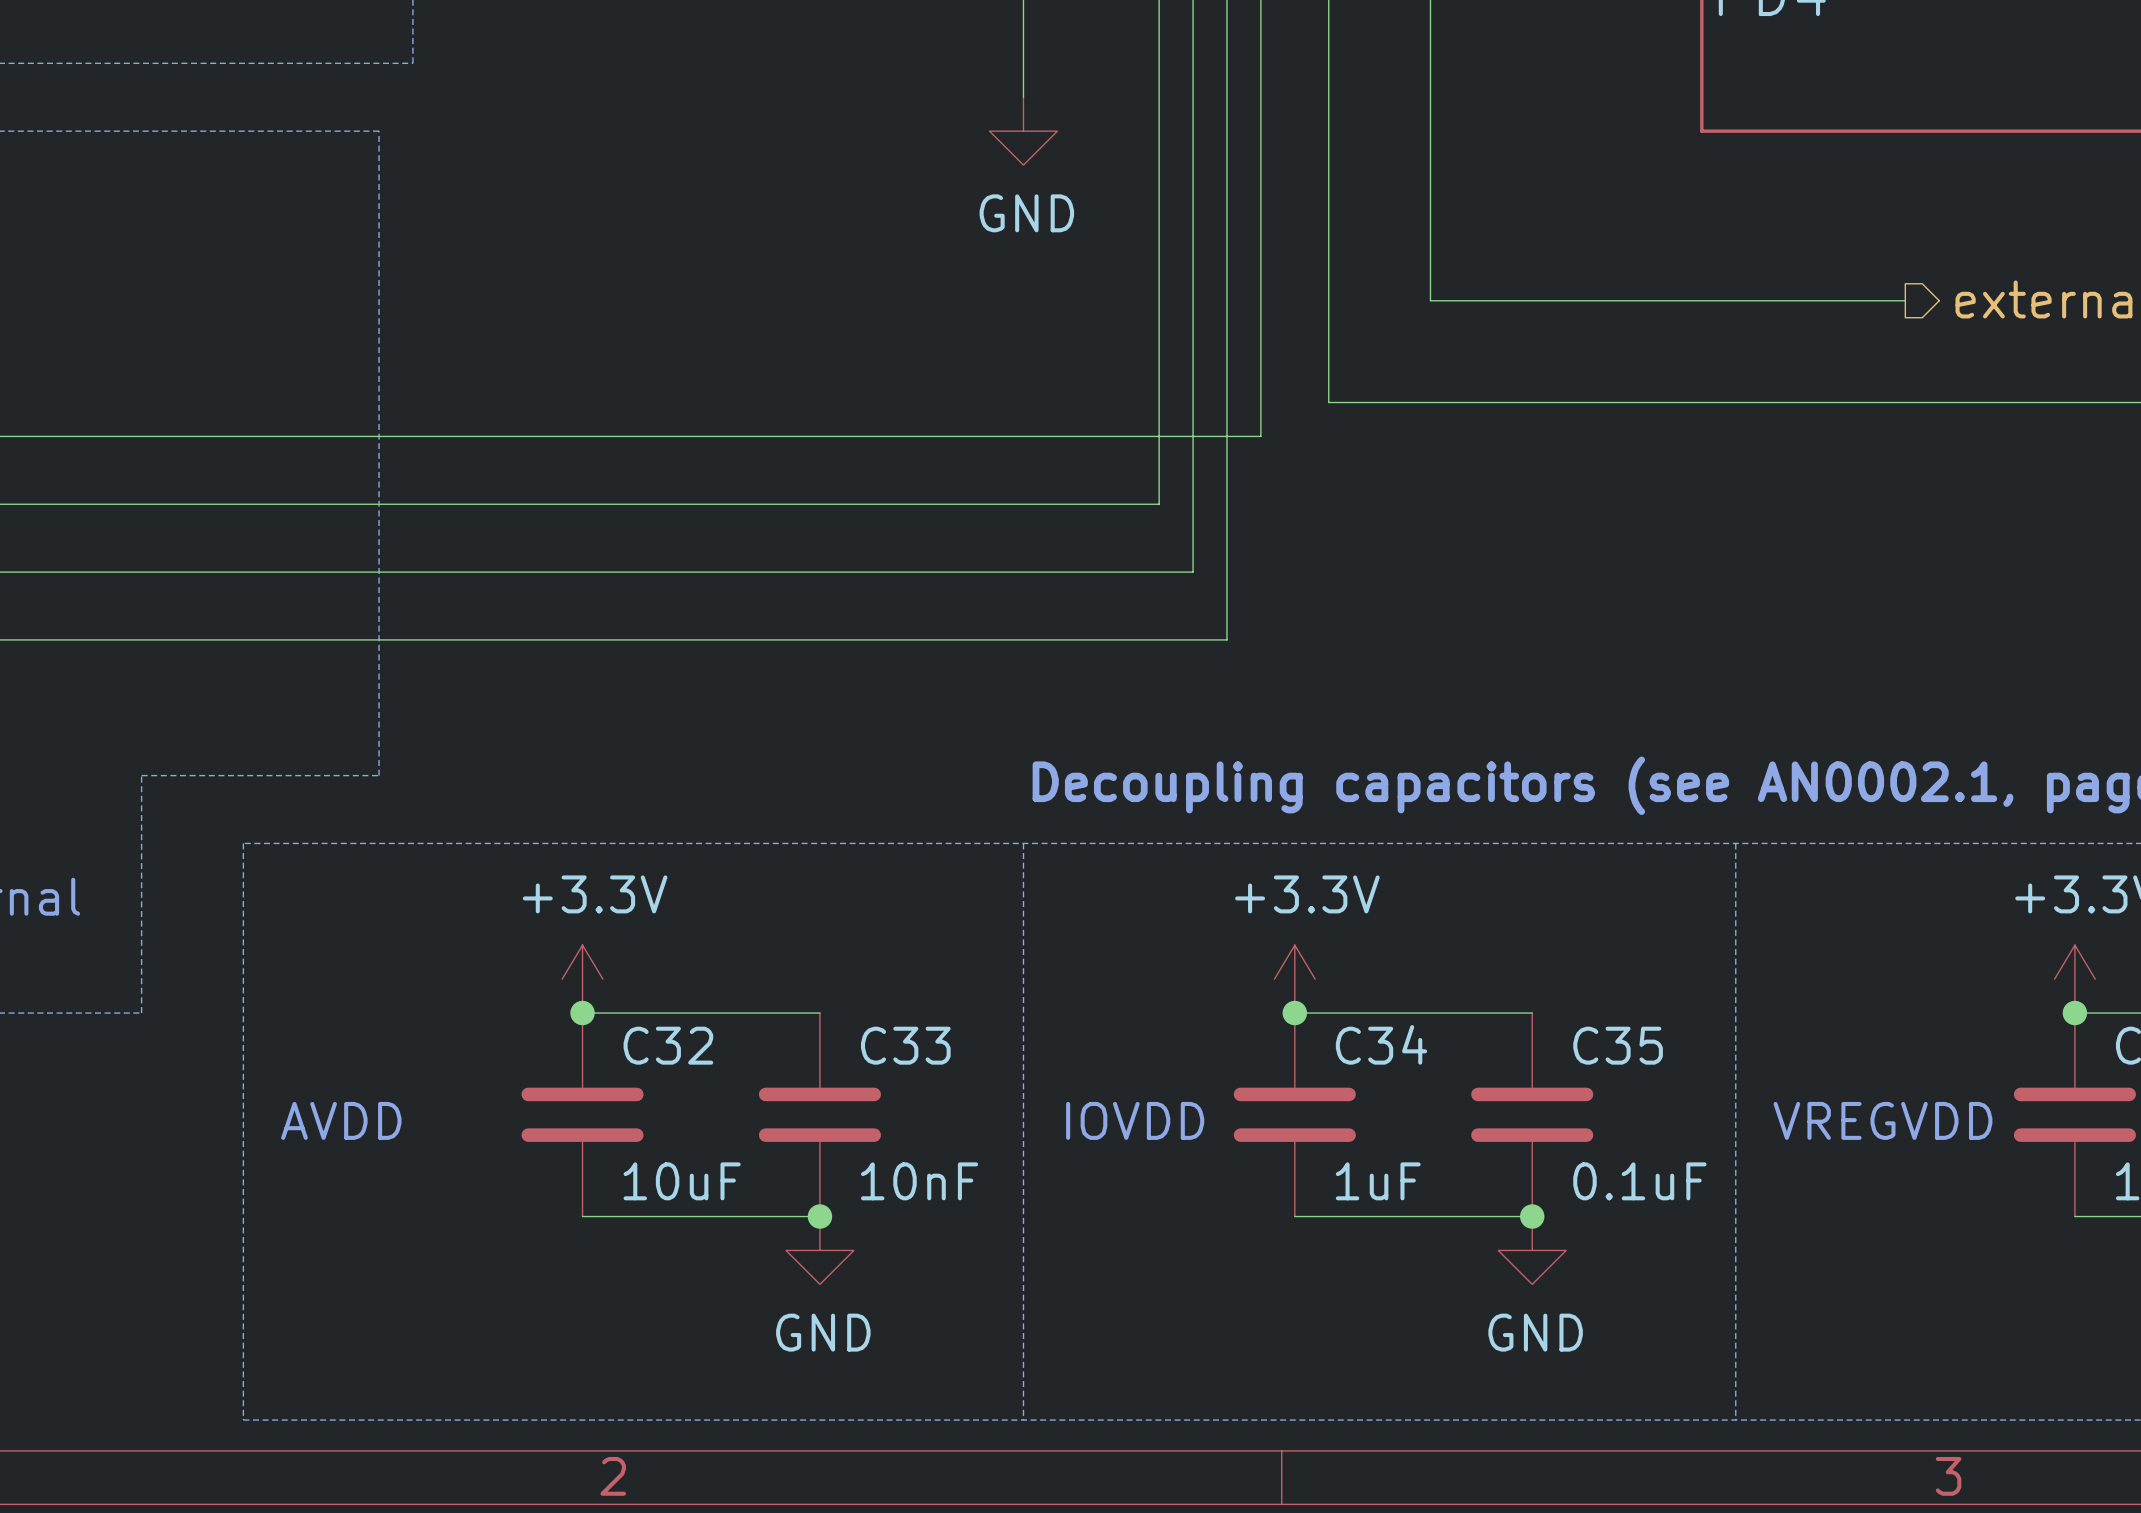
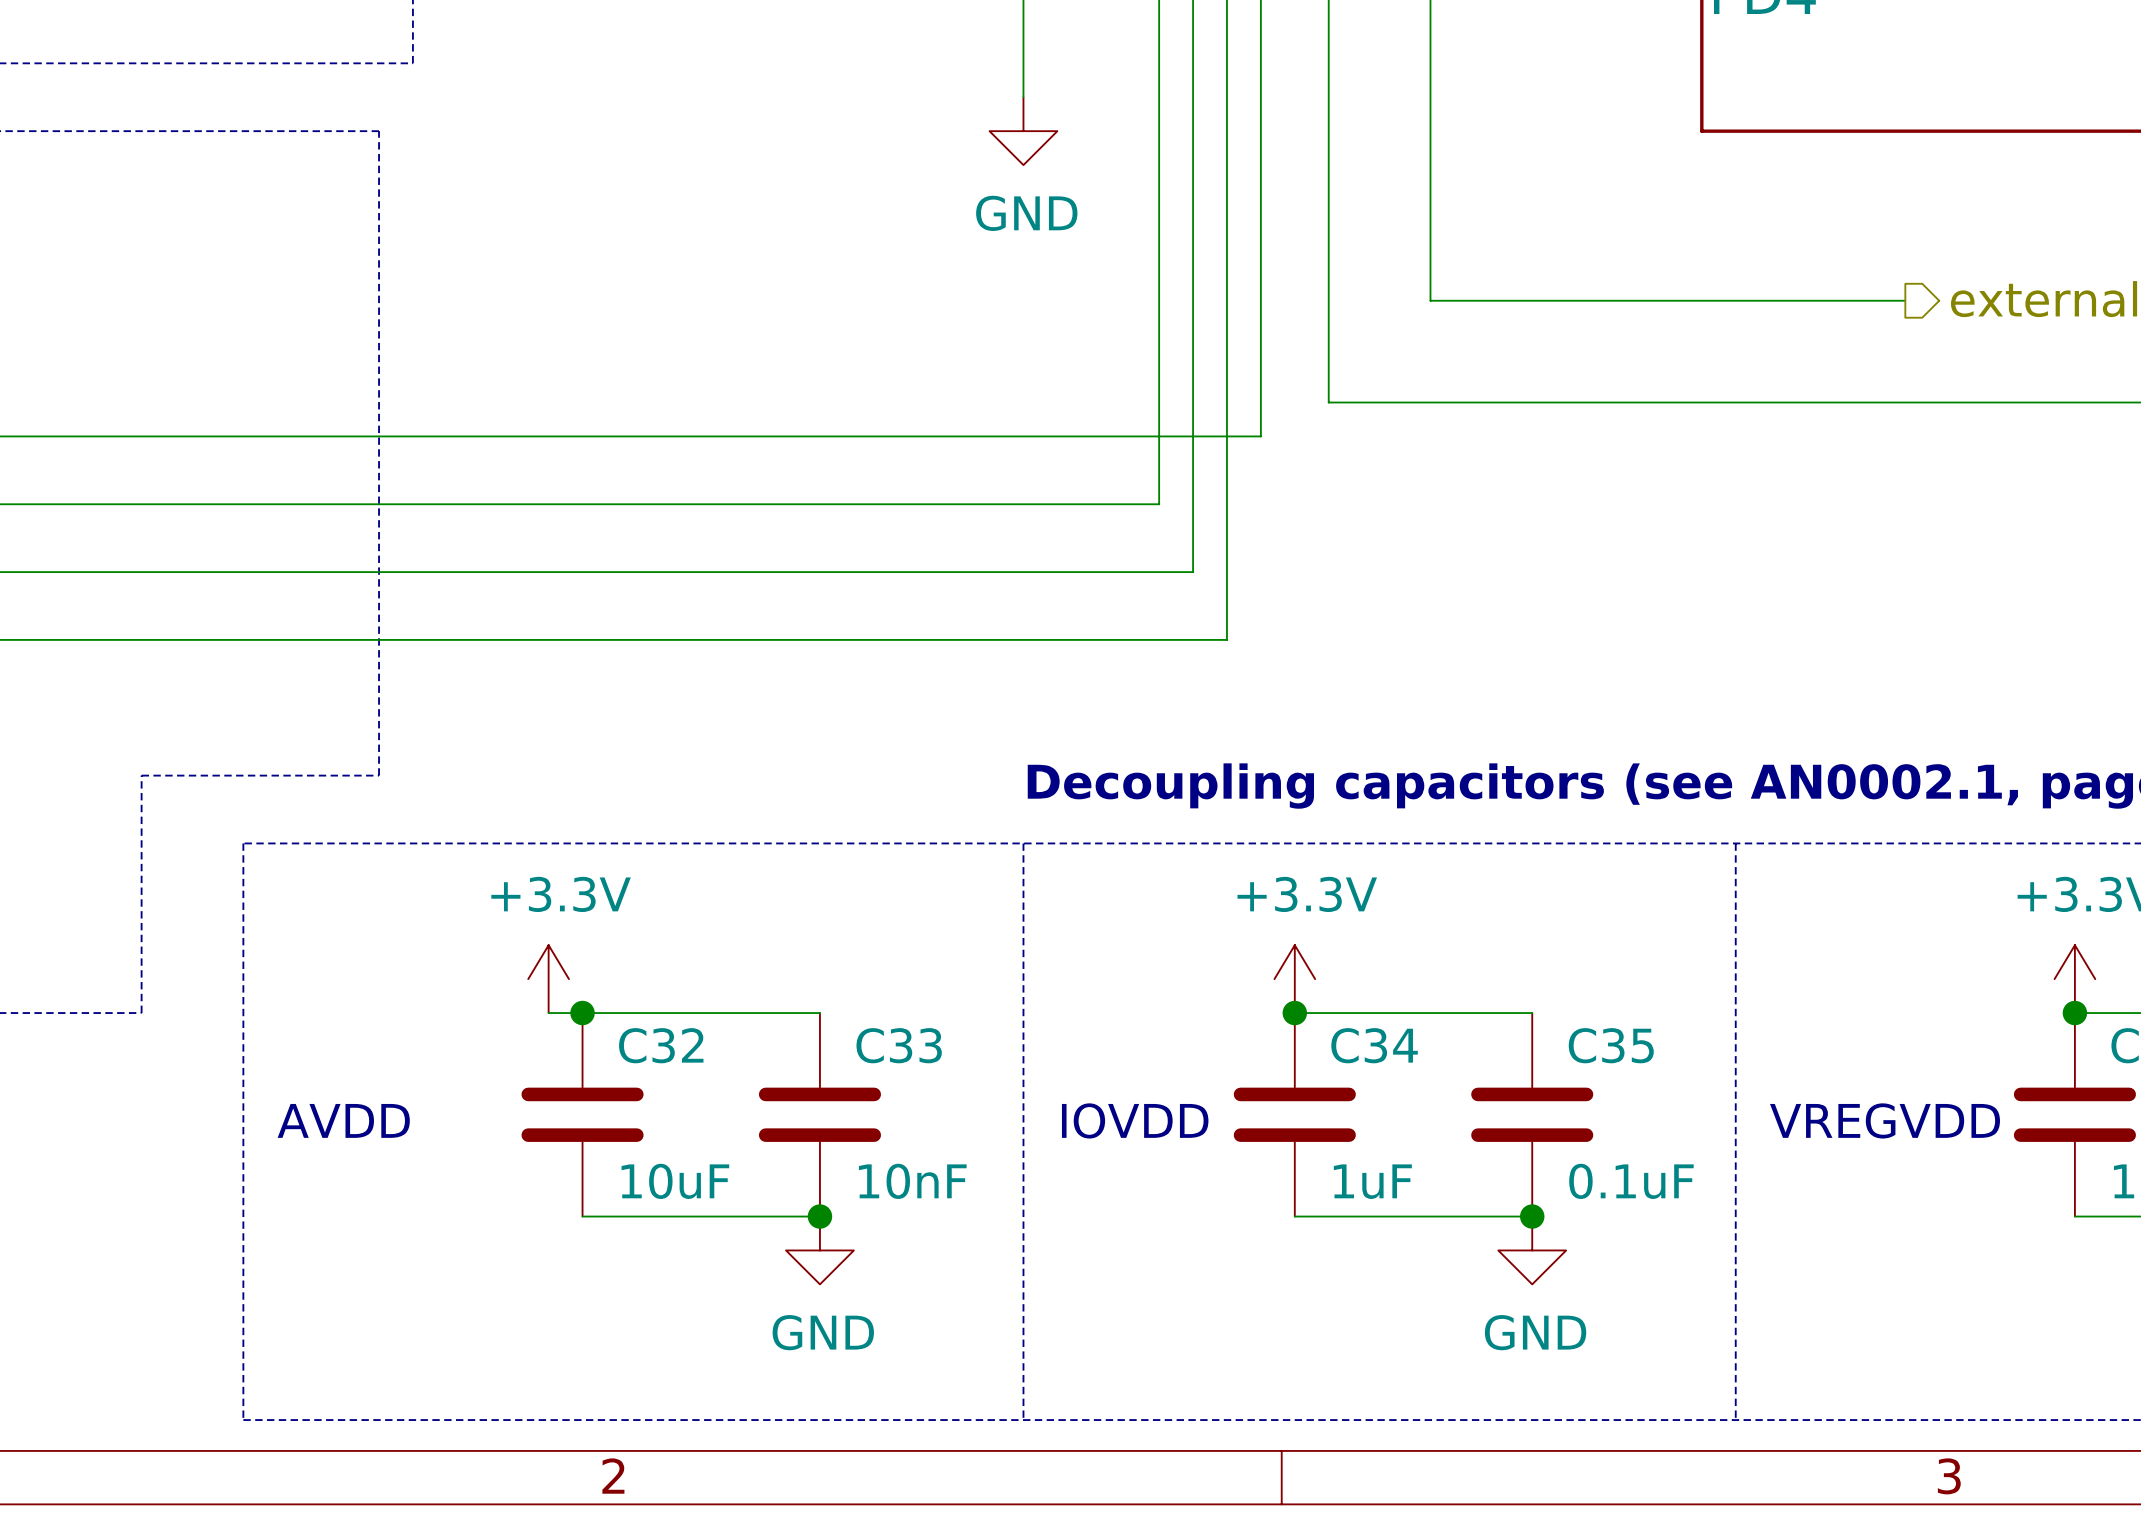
power symbol position: +3.3V (582, 979) -> +3.3V (548, 979)
wire: none -> (548, 1013) (582, 1013)

